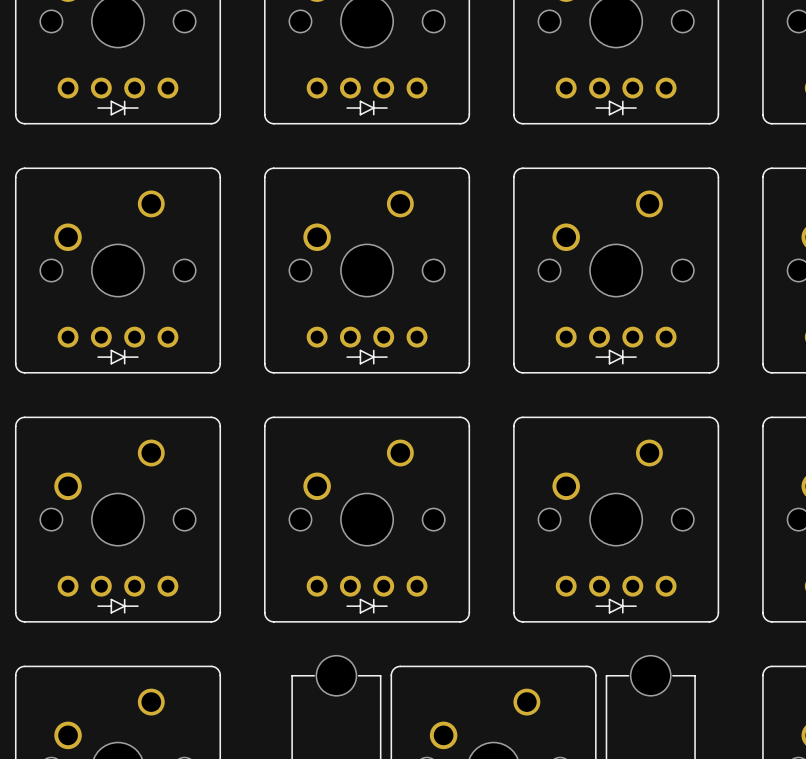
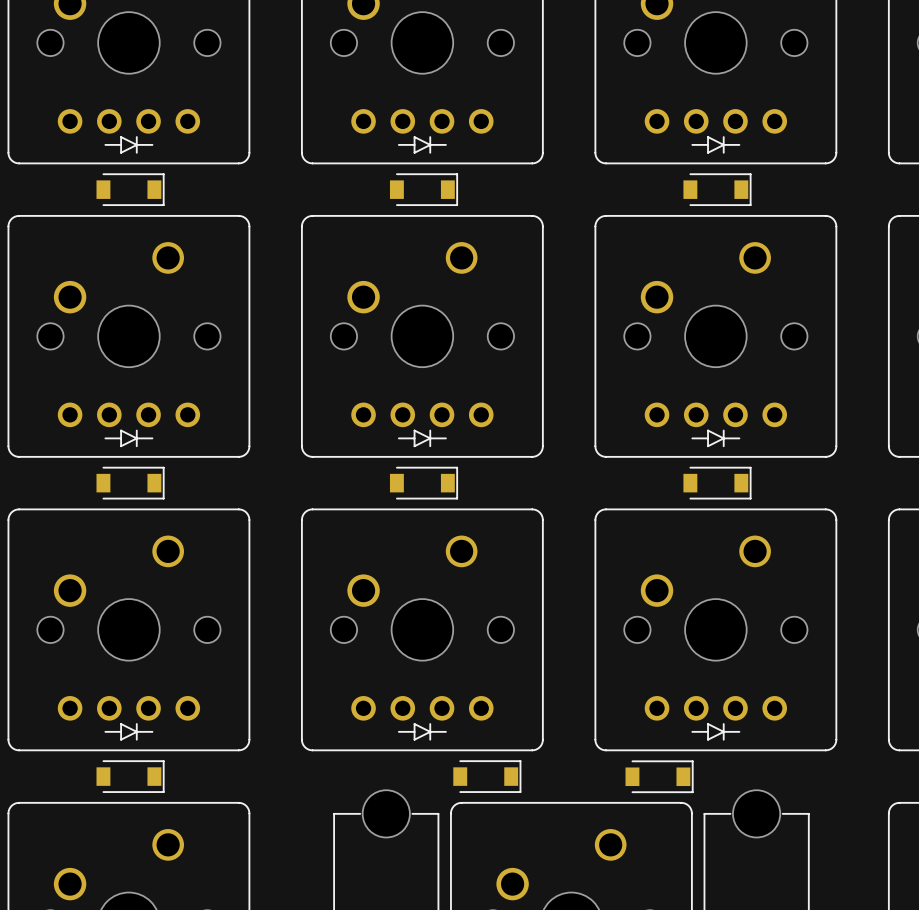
part: none -> (130, 189)
part: none -> (424, 189)
part: none -> (717, 189)
part: none -> (130, 483)
part: none -> (424, 483)
part: none -> (717, 483)
part: none -> (130, 776)
part: none -> (487, 776)
part: none -> (659, 776)

